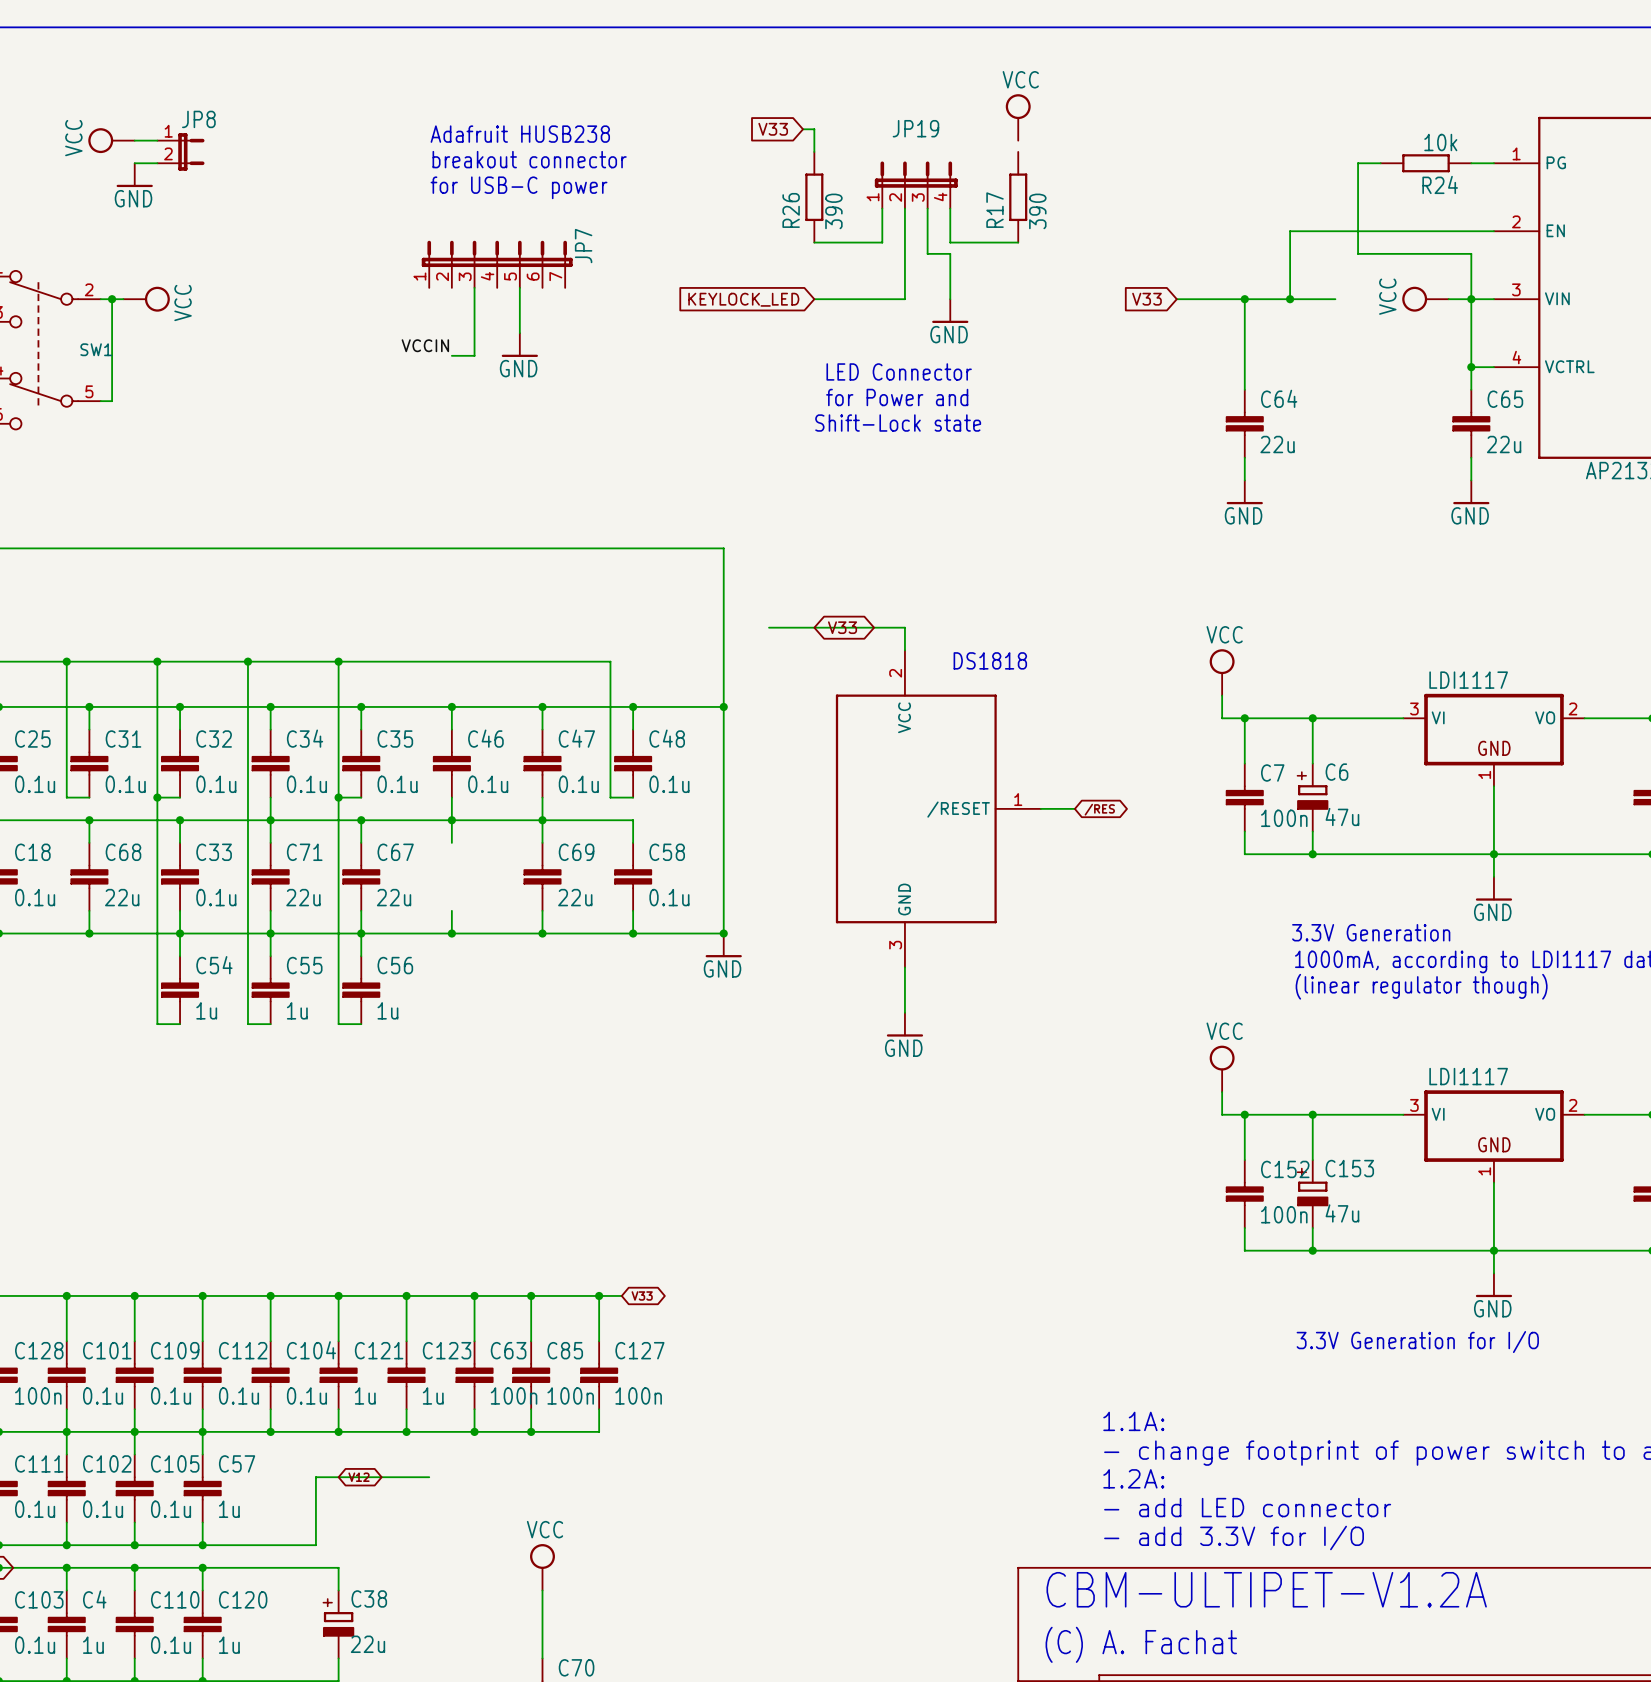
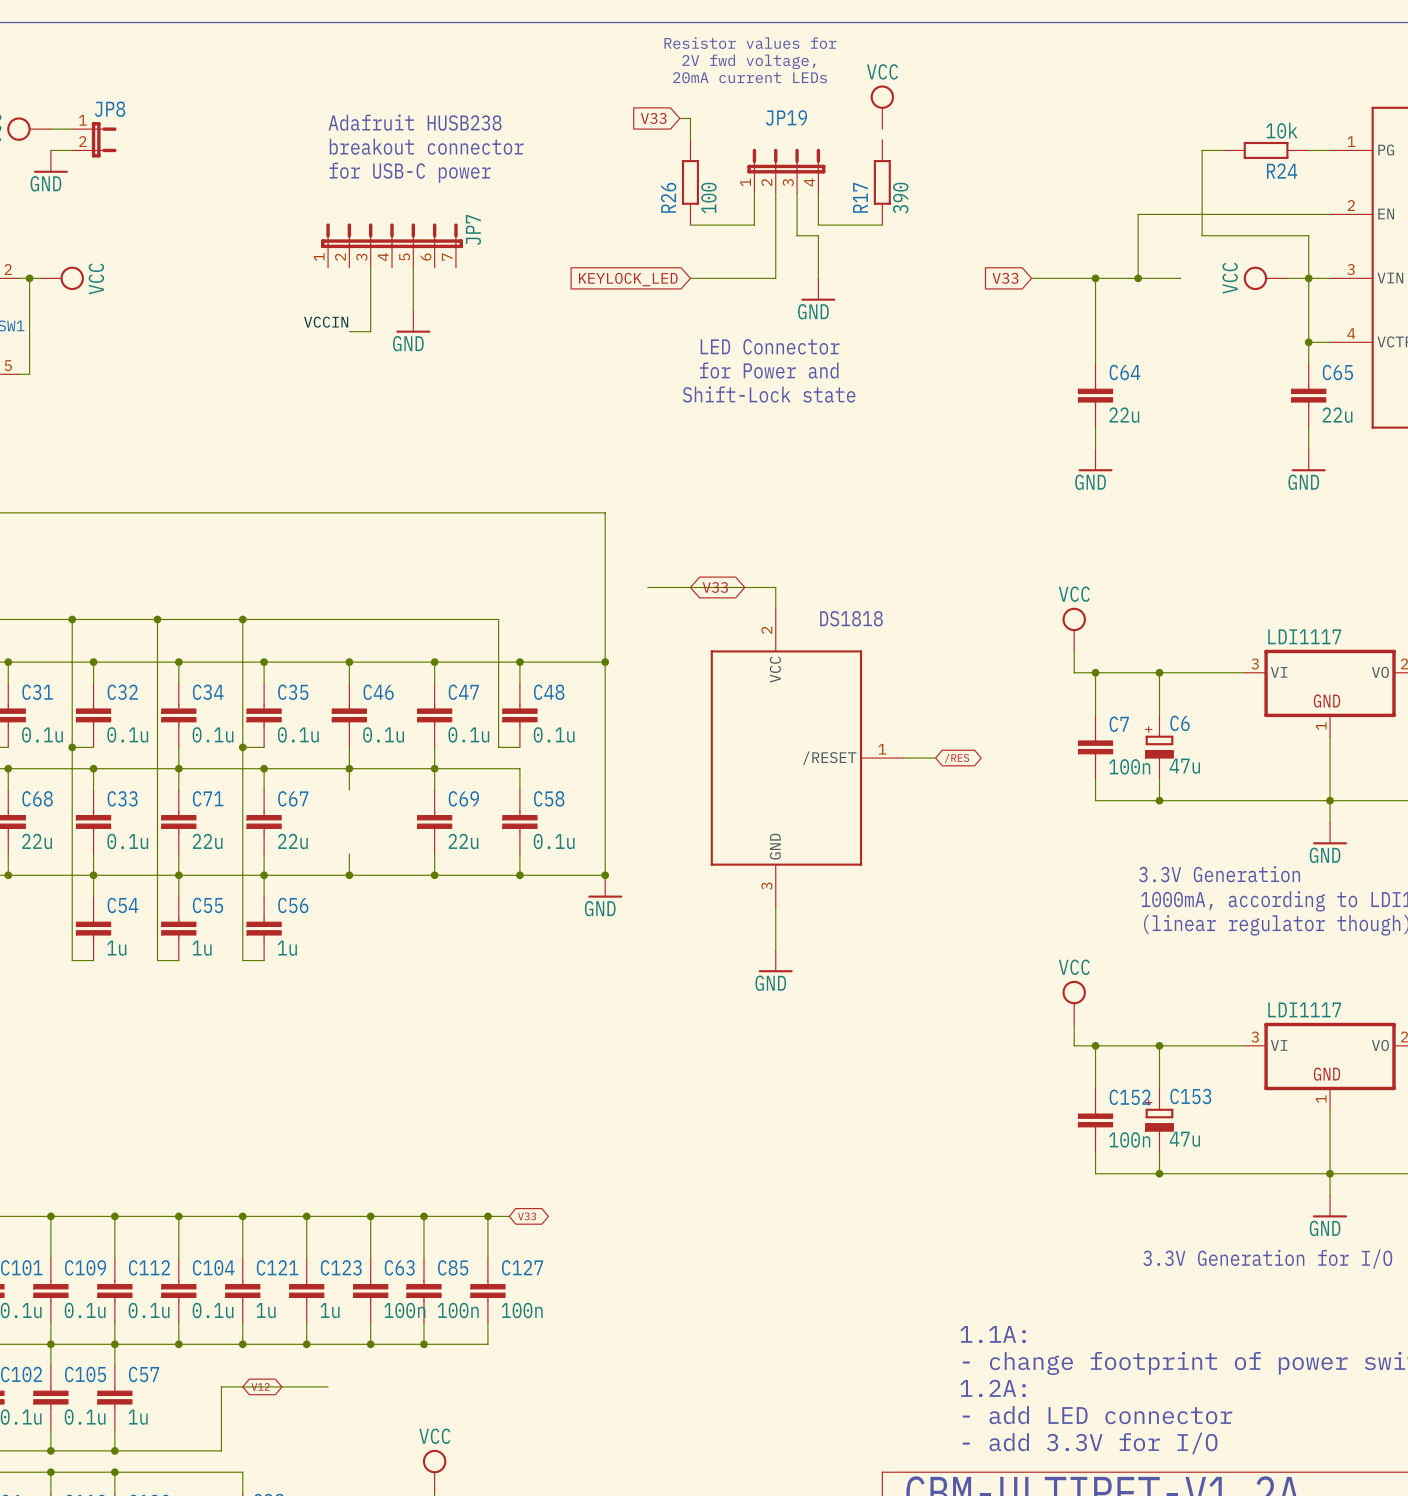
text: none -> Resistor values for (750, 43)
text: none -> 2V fwd voltage, (749, 61)
text: none -> 20mA current LEDs (750, 77)
R26 value: 390 (833, 211) -> 100 (708, 198)

